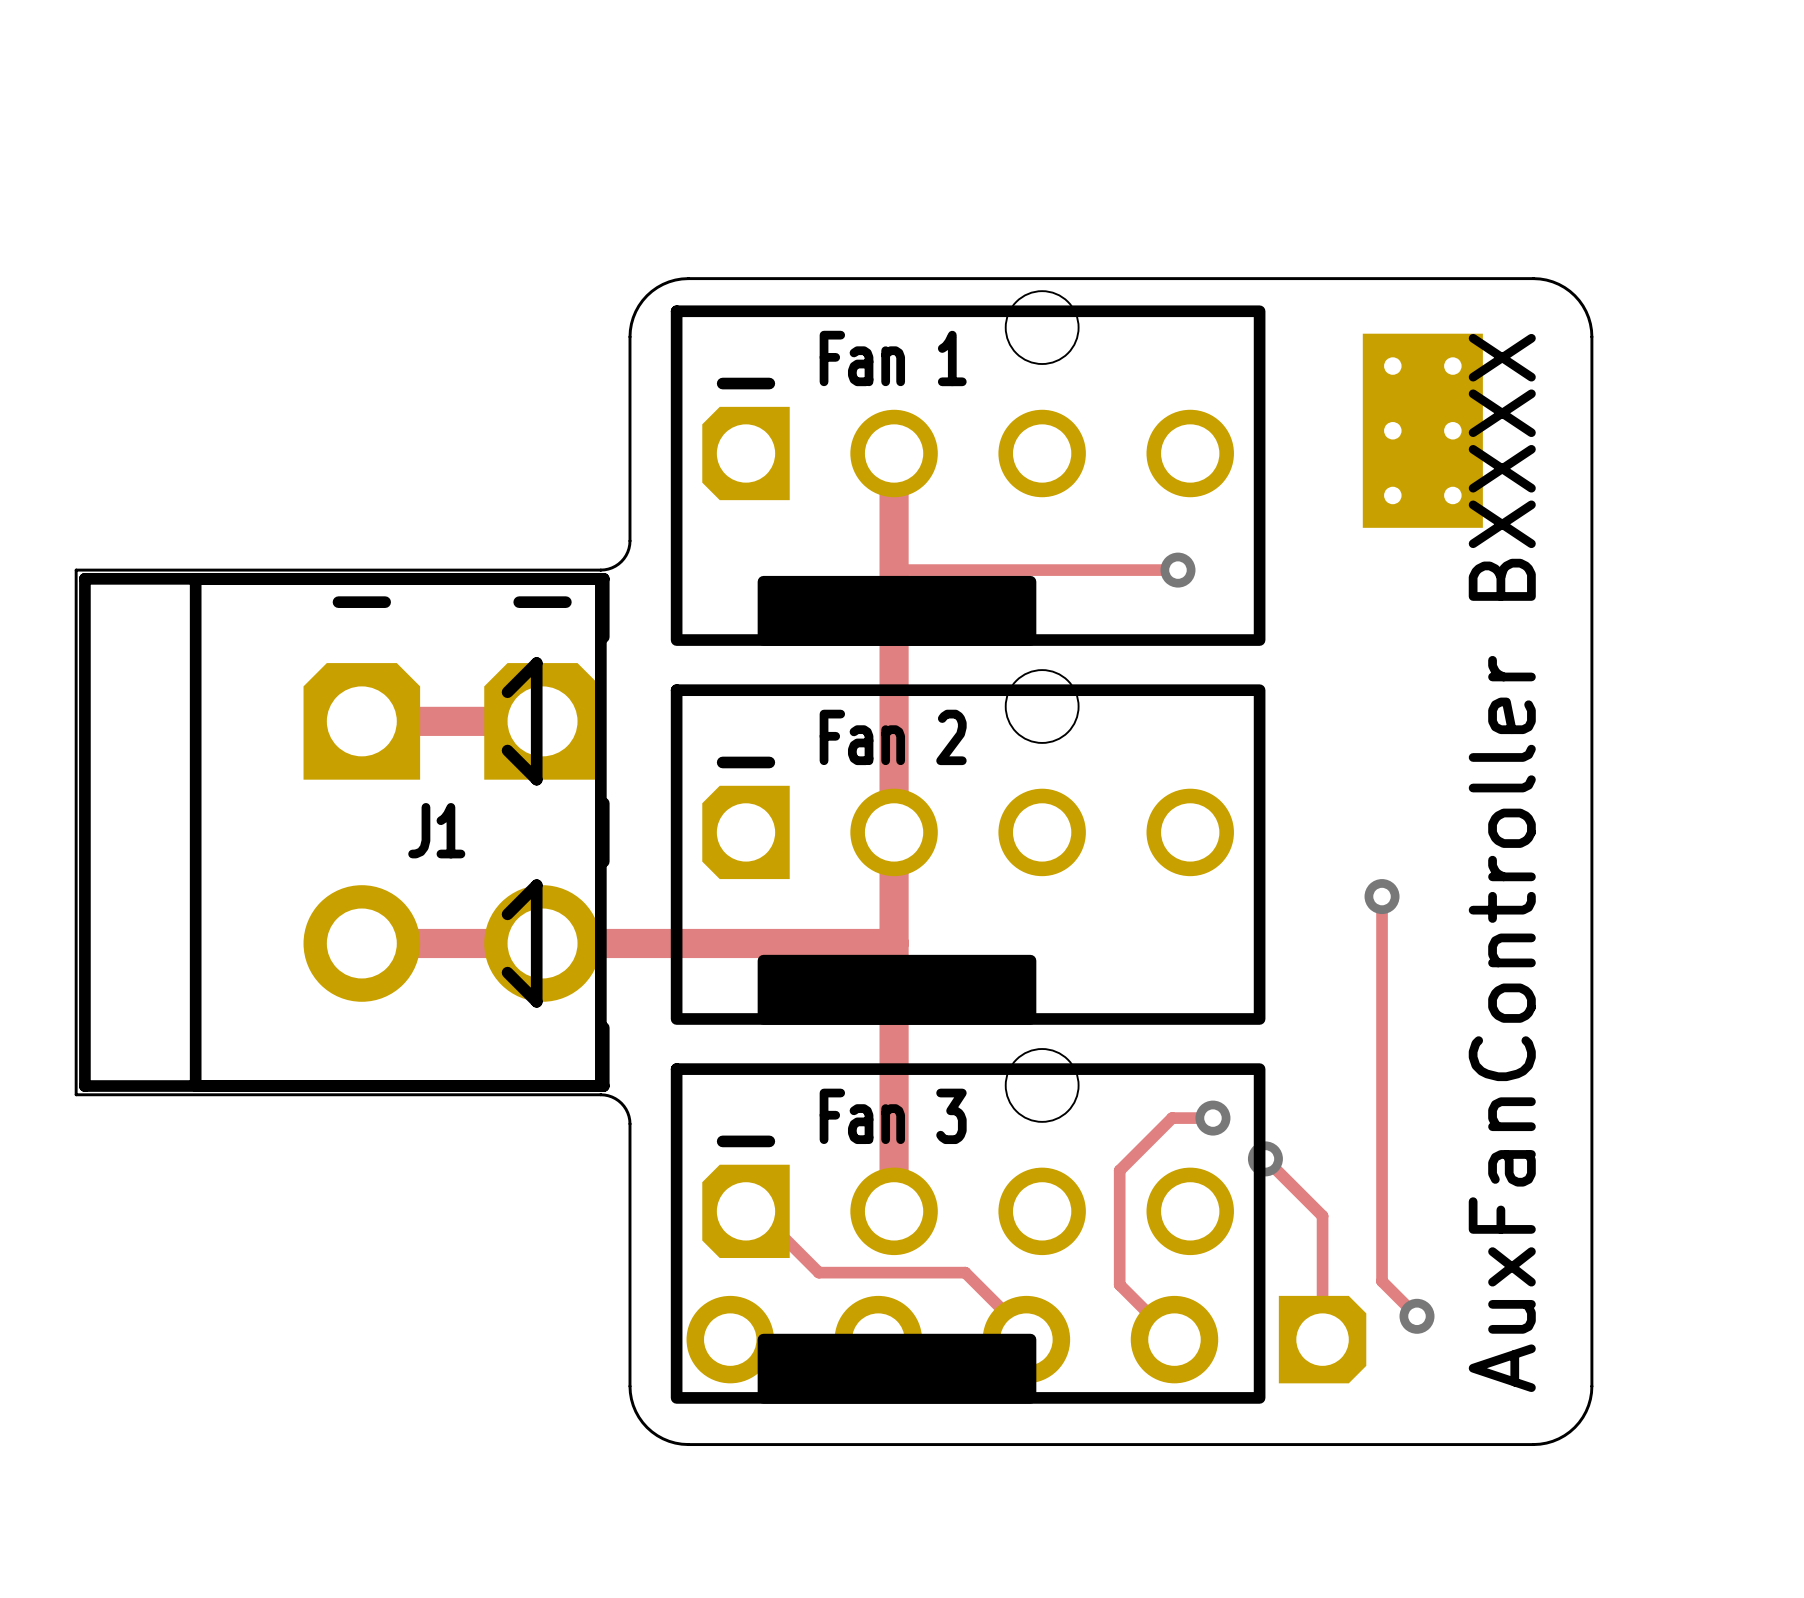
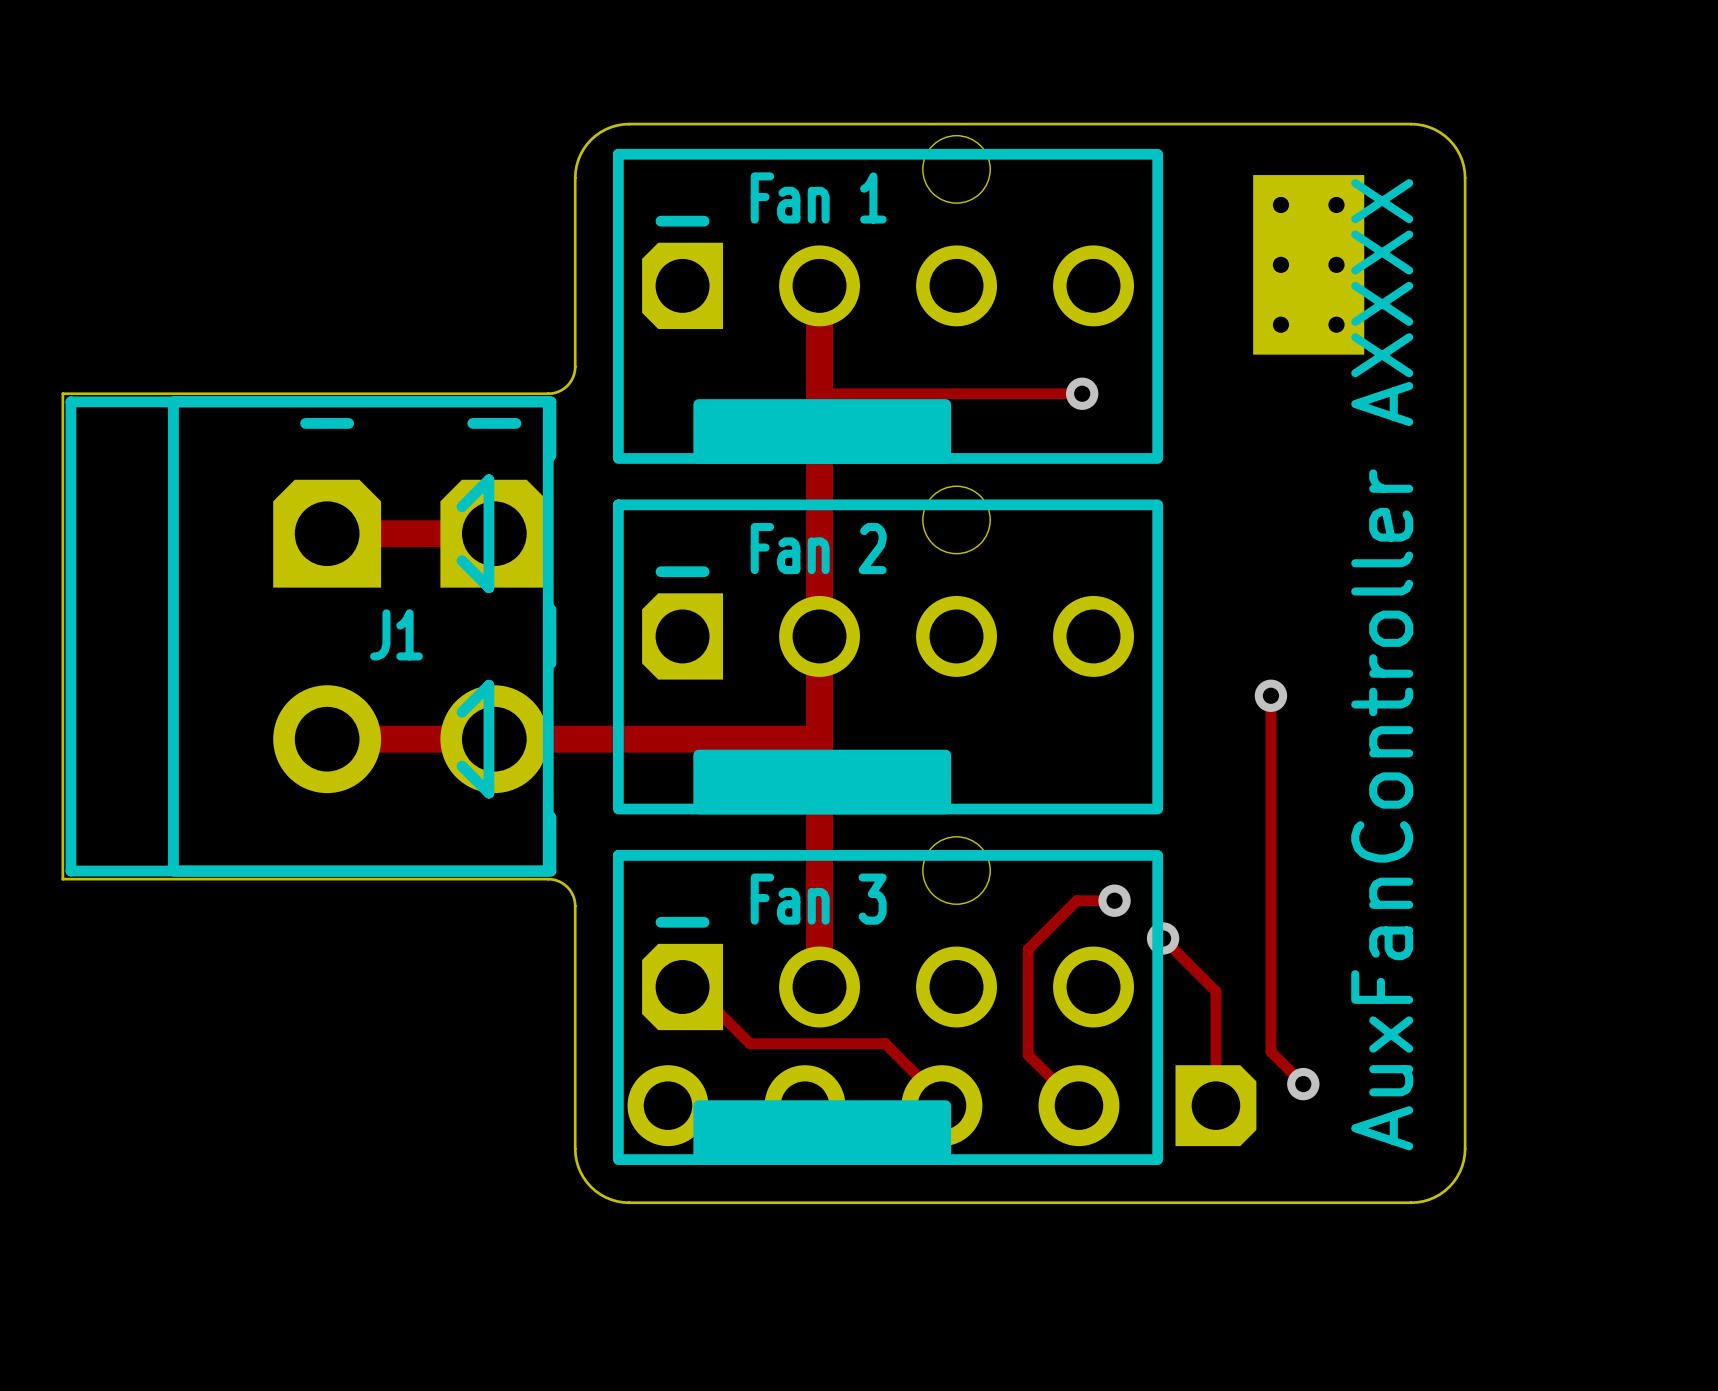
text: AuxFanController BXXXX (1502, 862) -> AuxFanController AXXXX (1382, 664)

